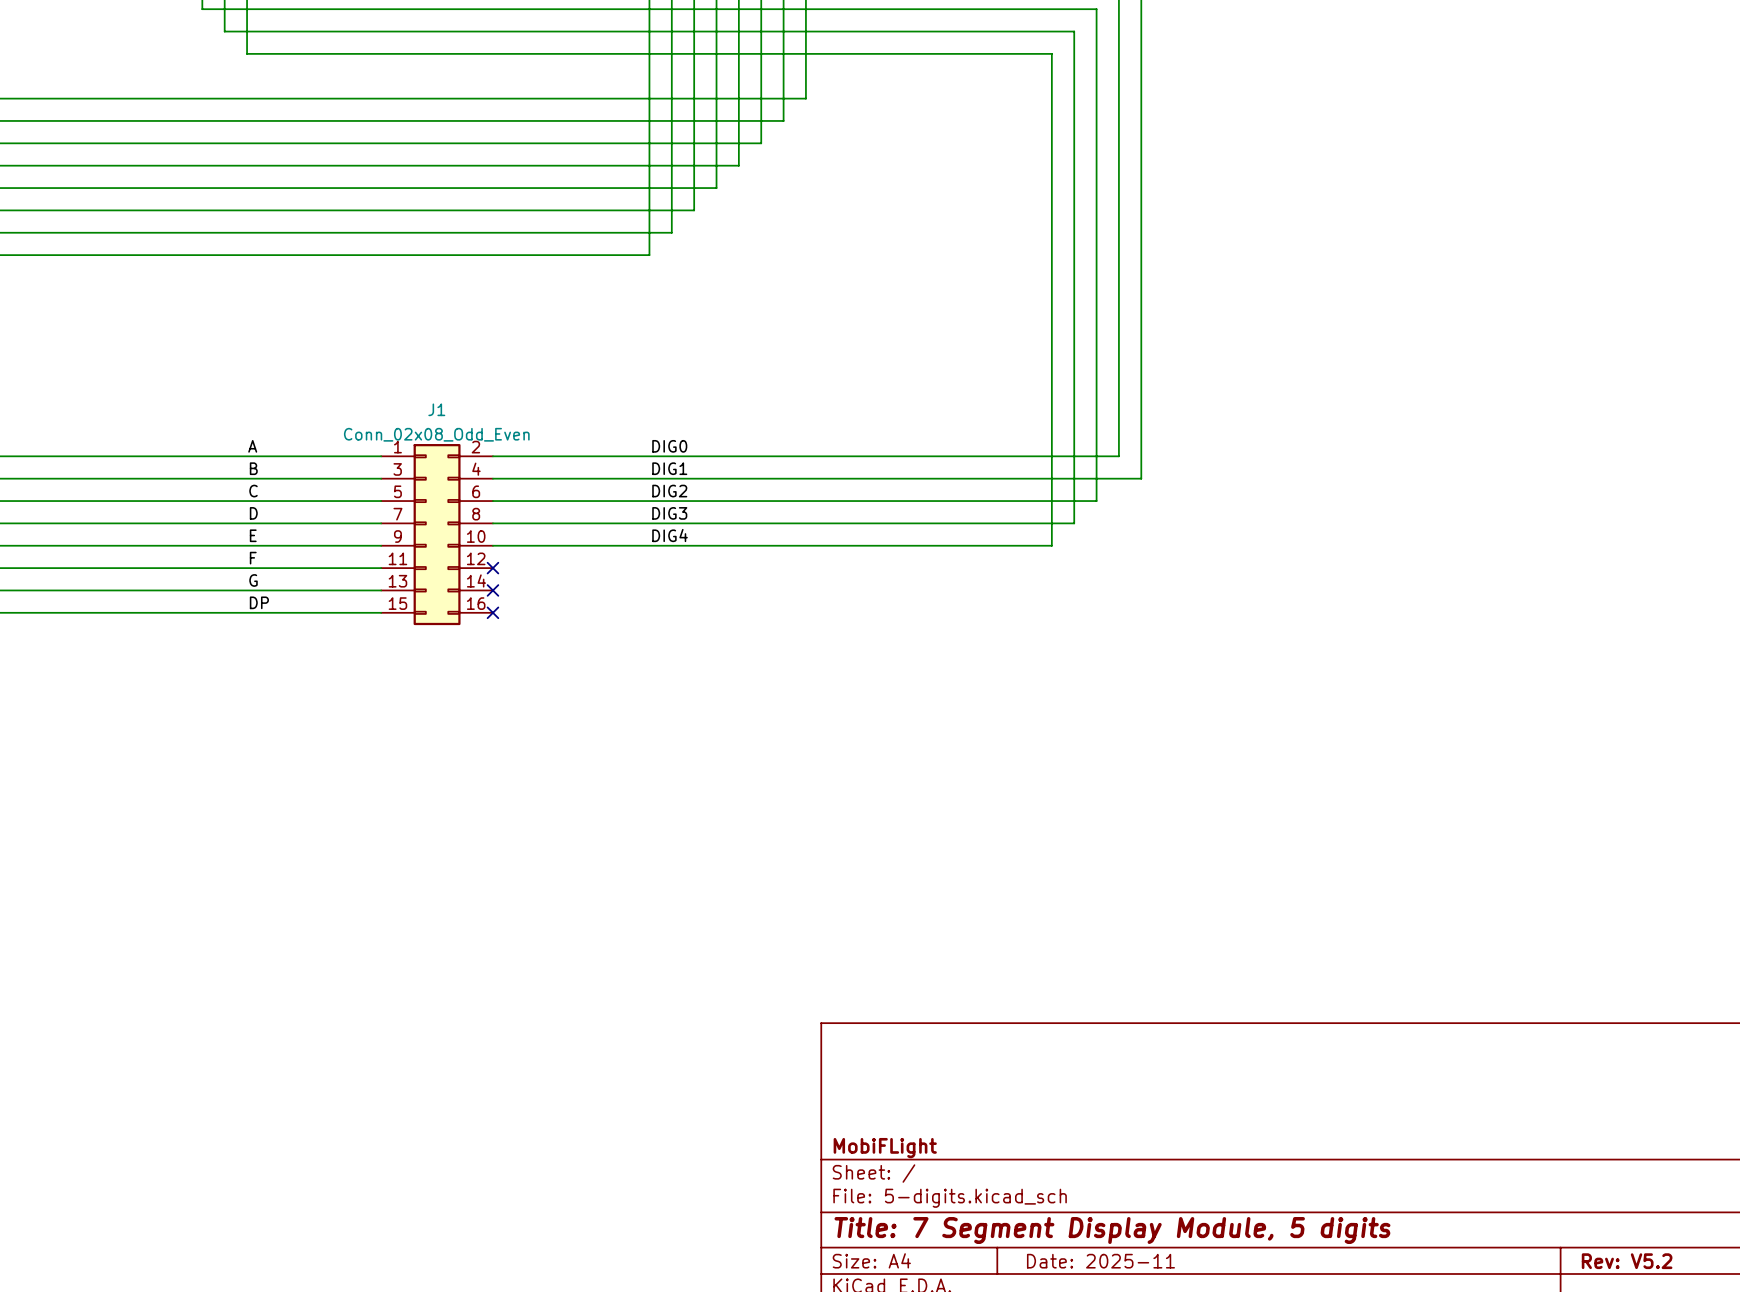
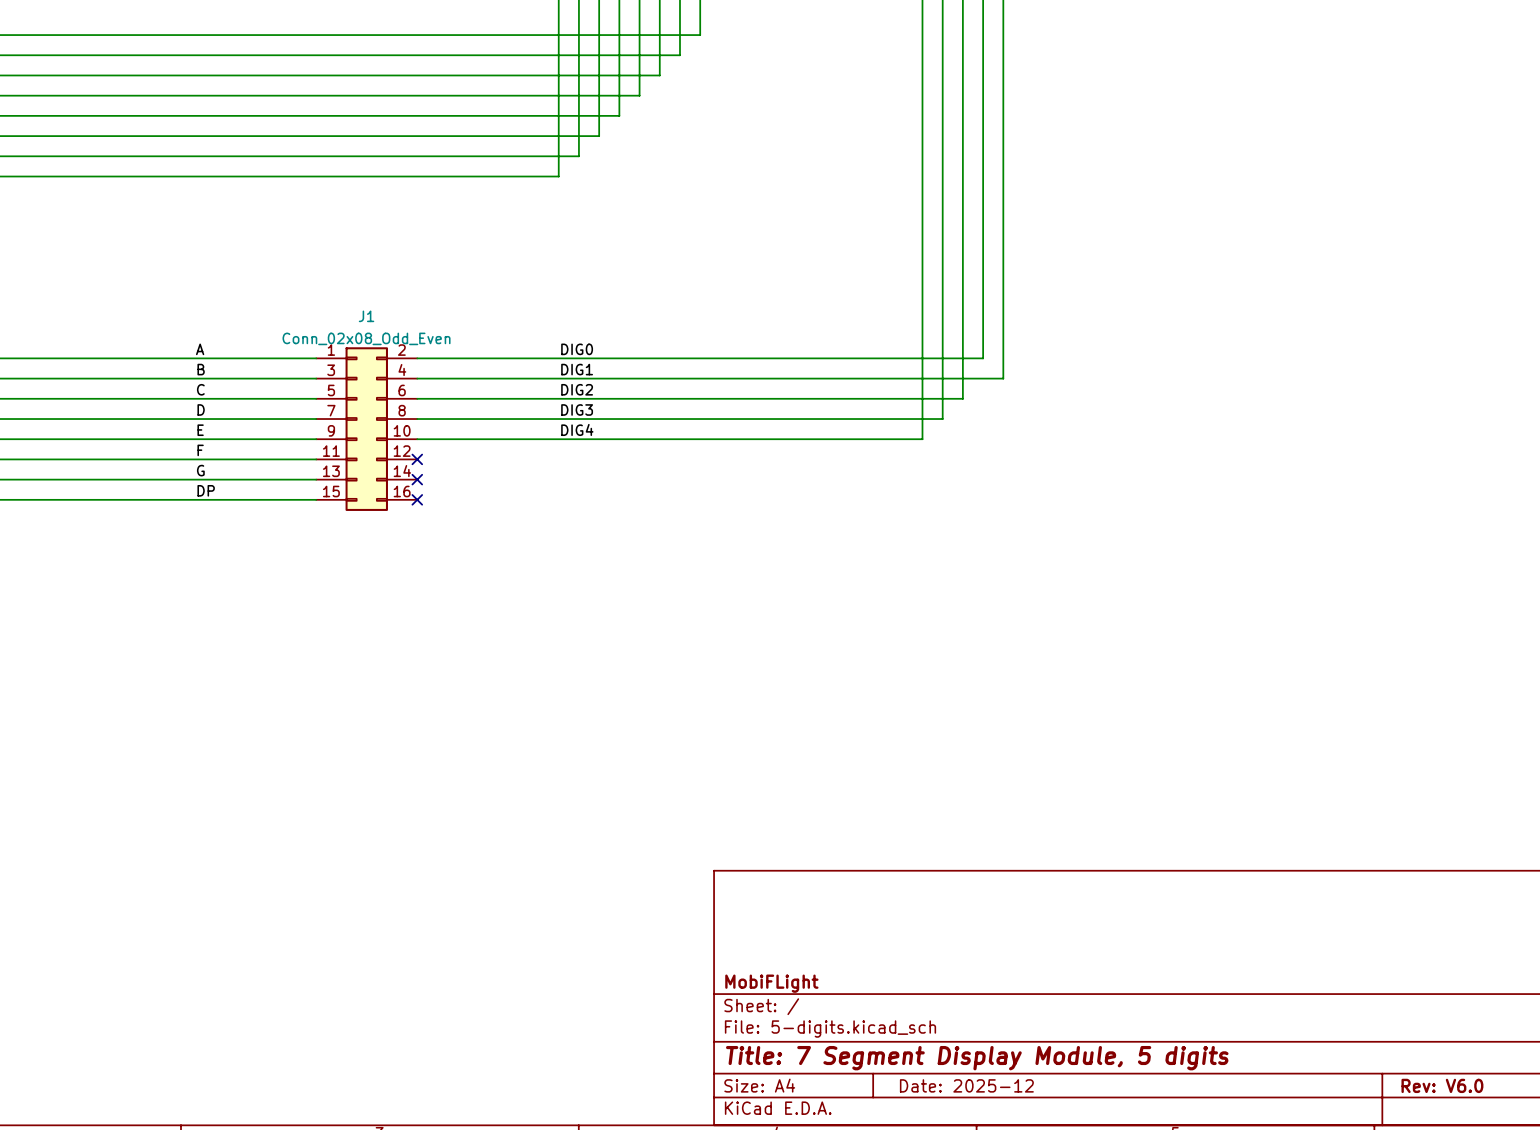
title block: Date: 2025-11 (1100, 1261) -> Date: 2025-12 (966, 1085)
title block: Rev: V5.2 (1627, 1261) -> Rev: V6.0 (1442, 1085)

